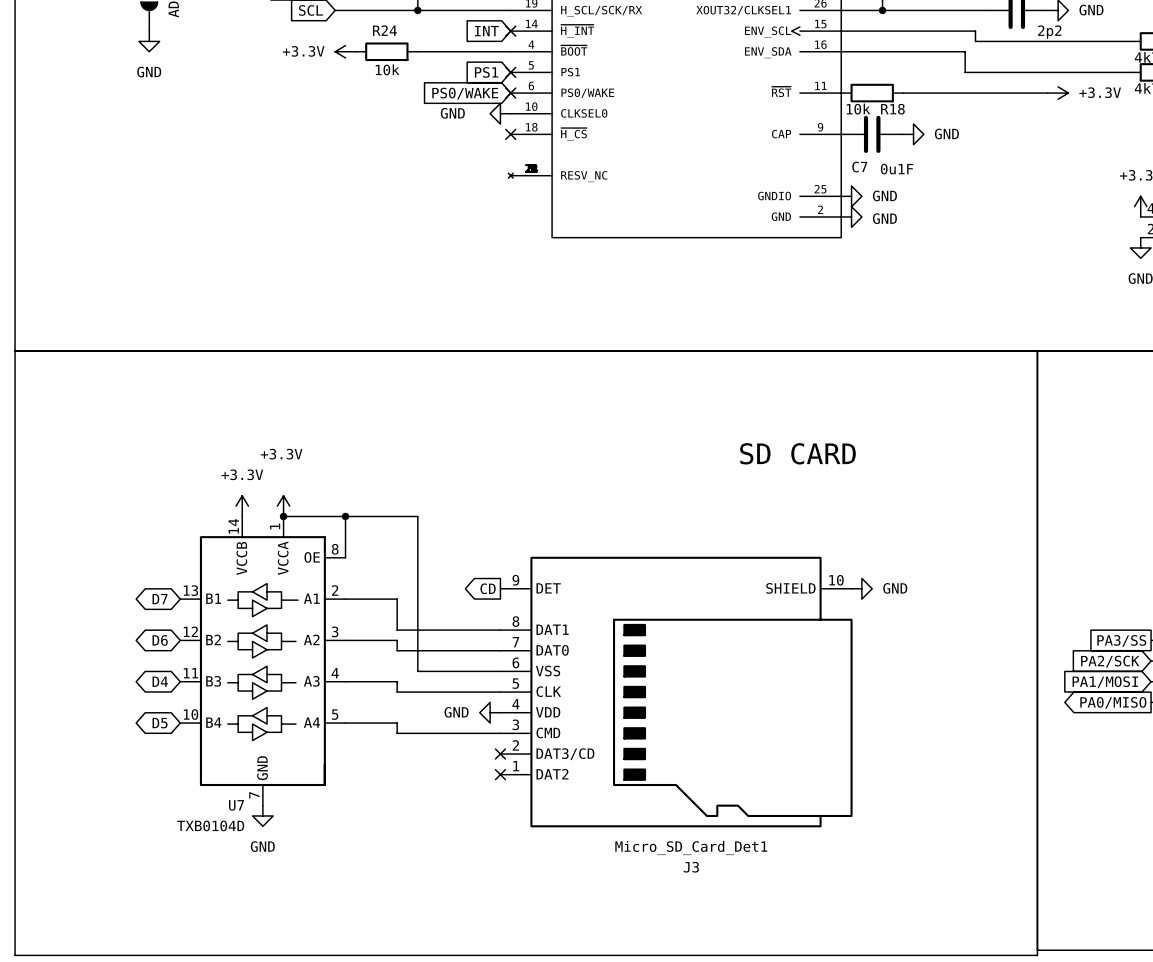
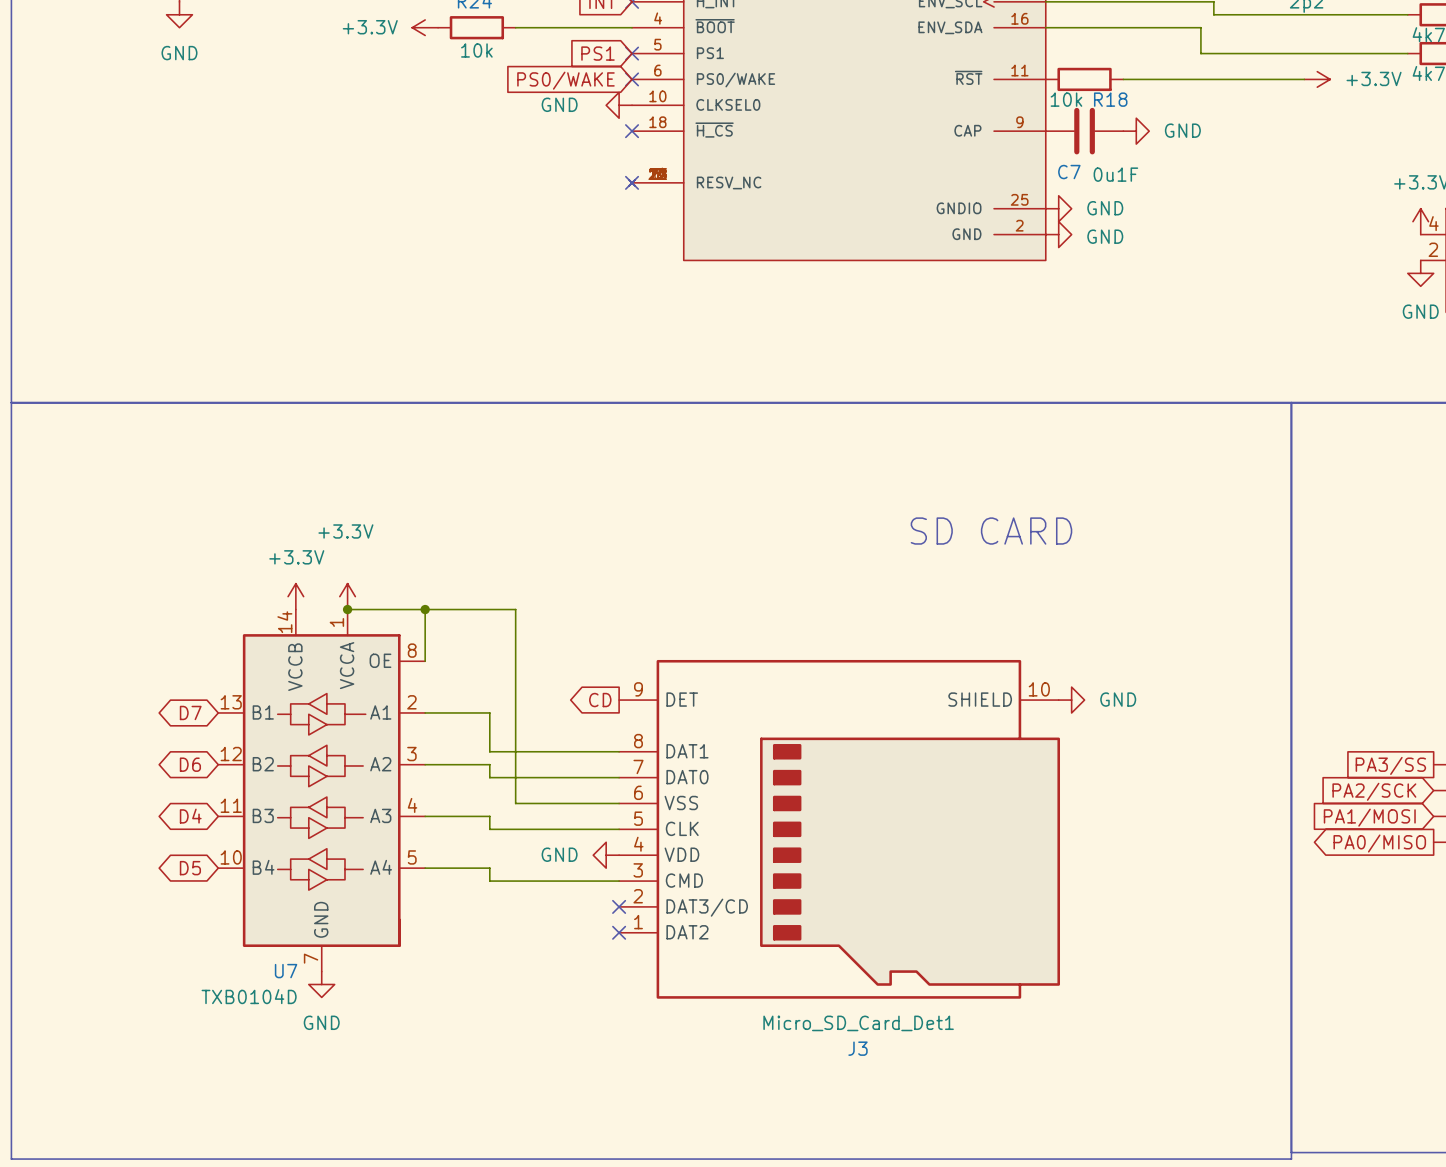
no-connect mark: none -> (632, 182)

